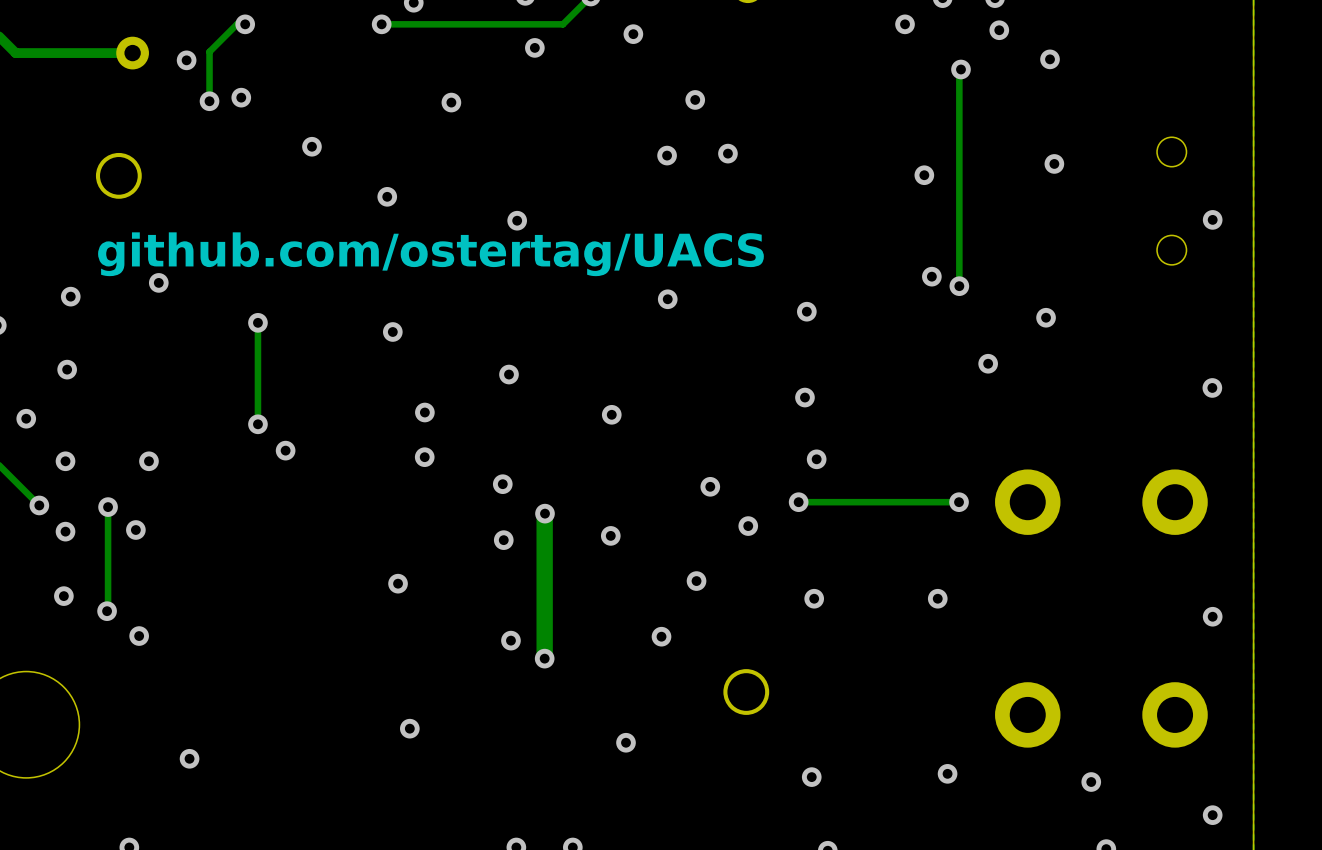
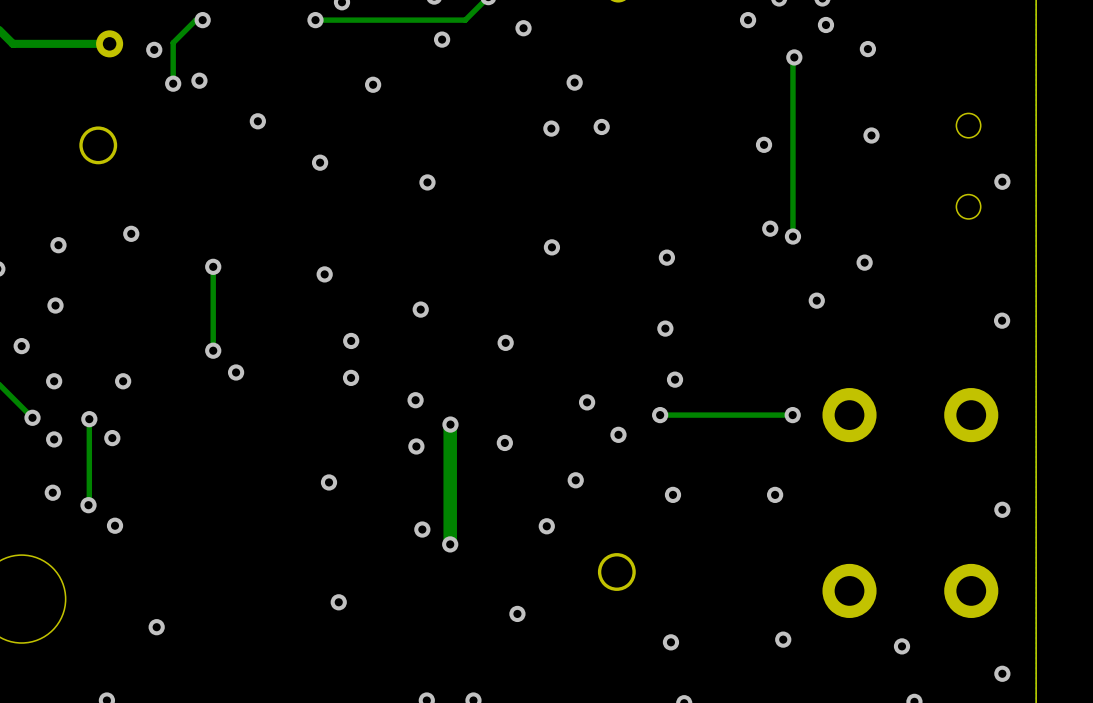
text: github.com/ostertag/UACS (430, 254) -> none

